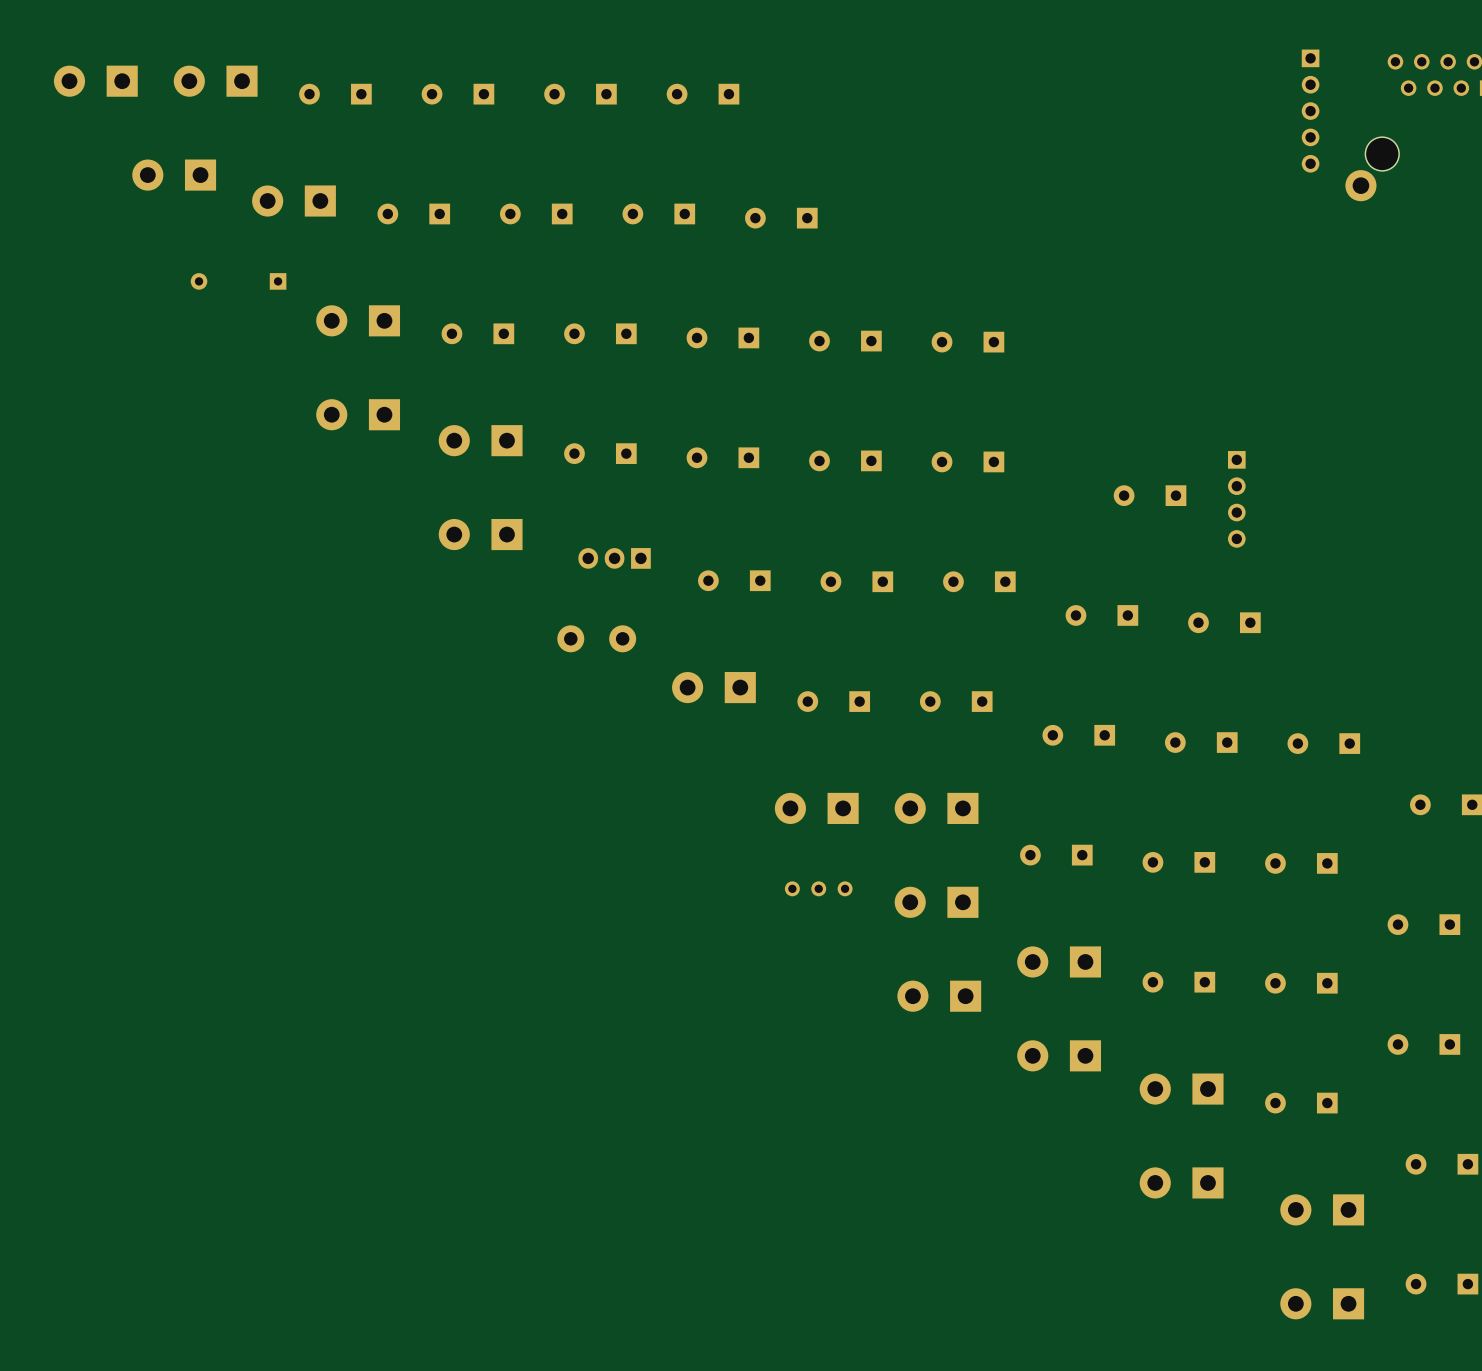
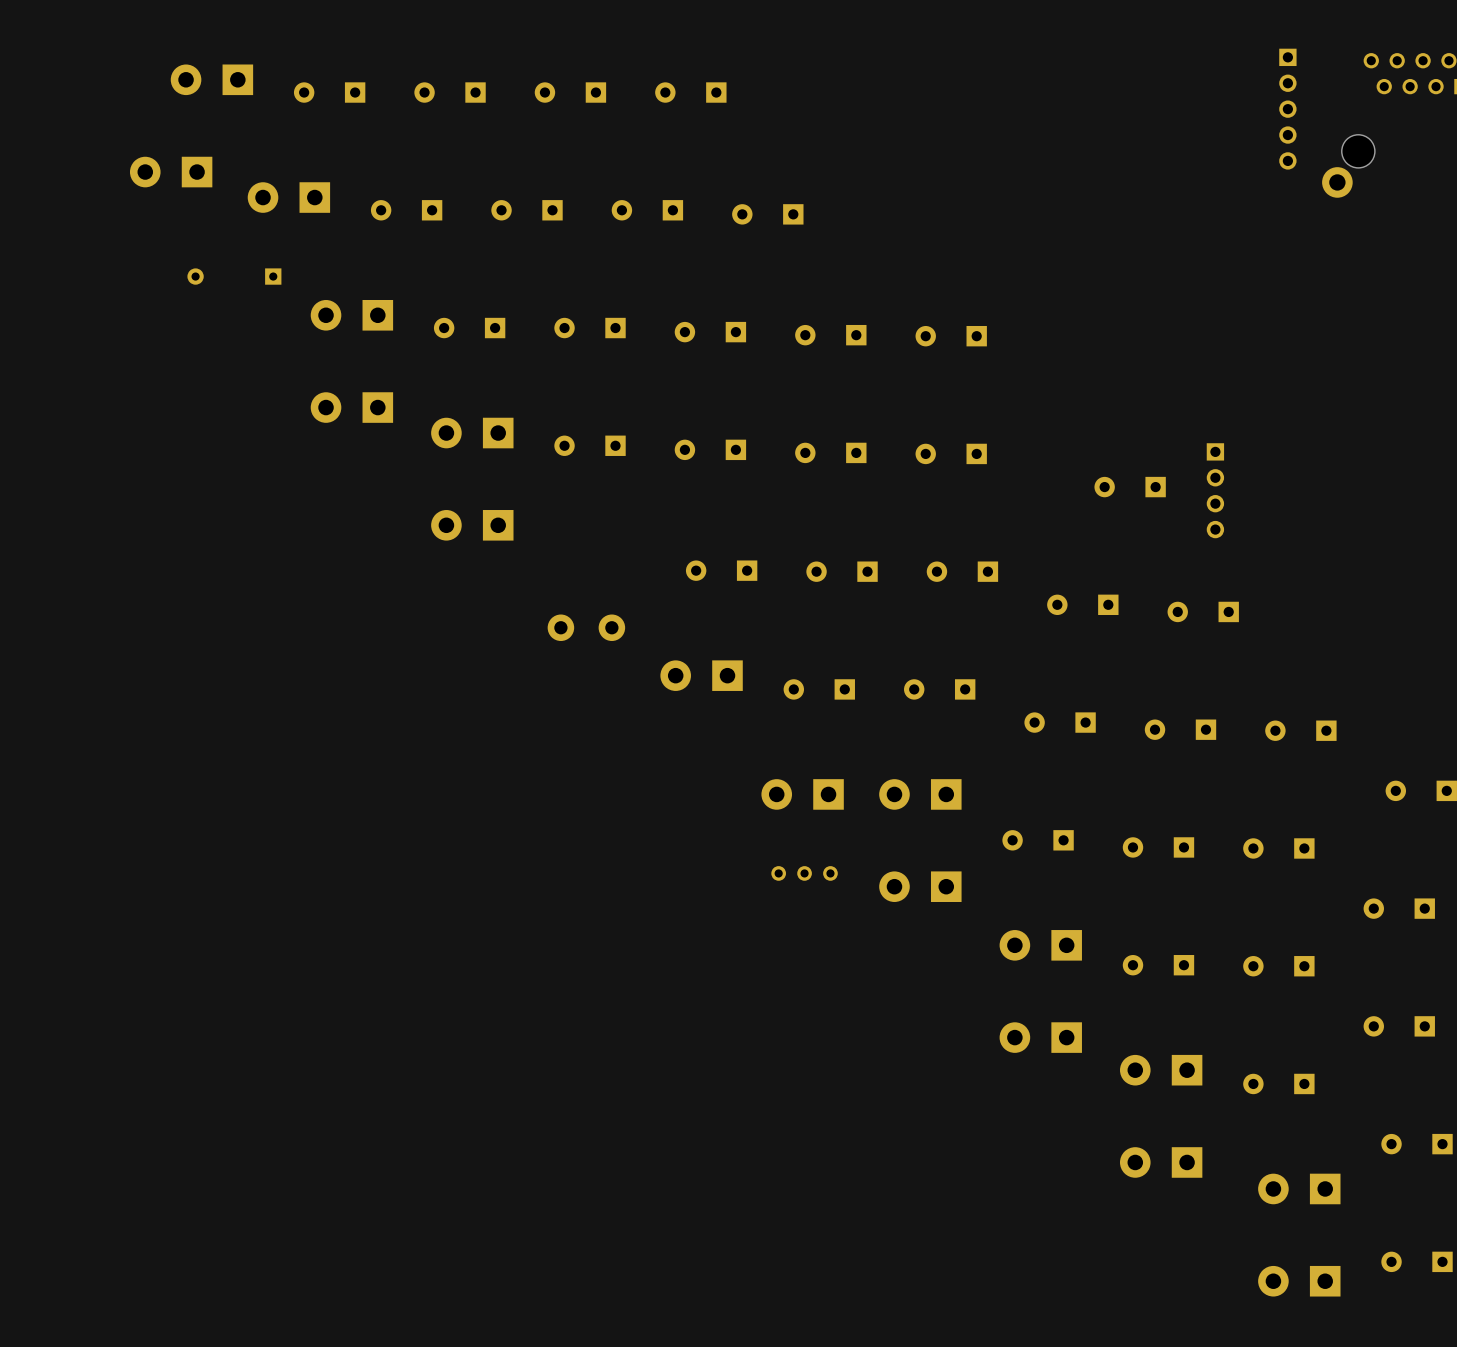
part: (95, 81) -> none
part: (614, 558) -> none
part: (939, 996) -> none

